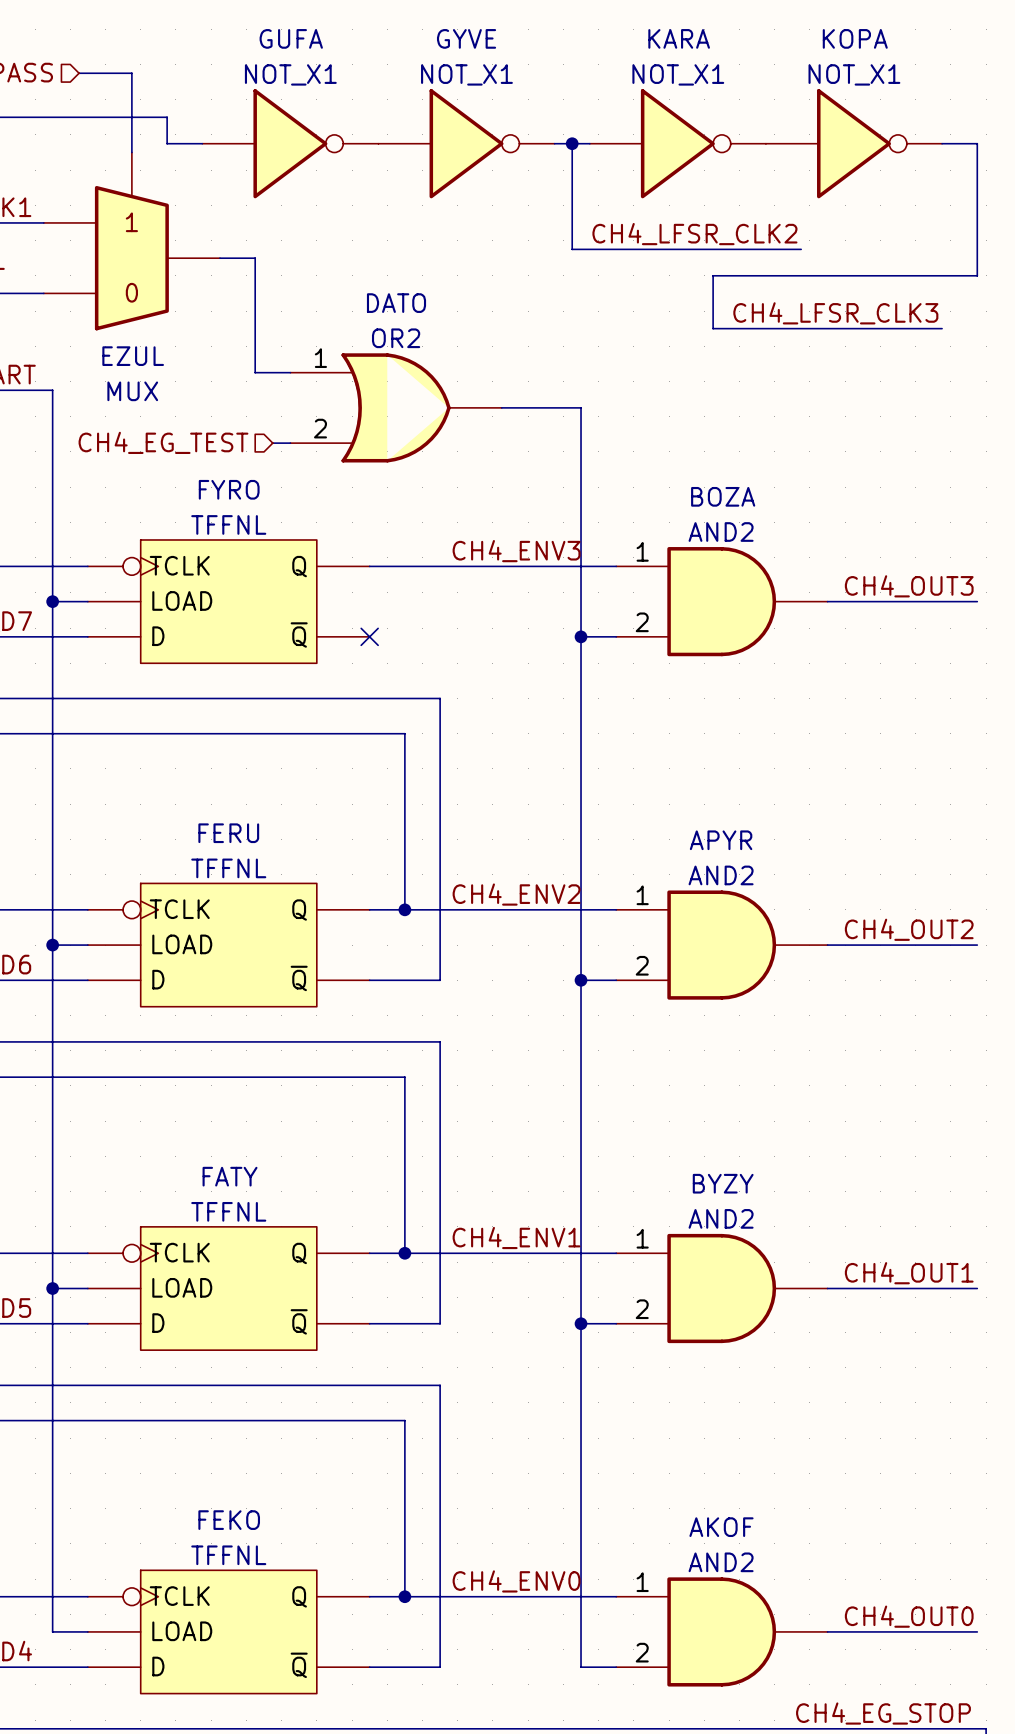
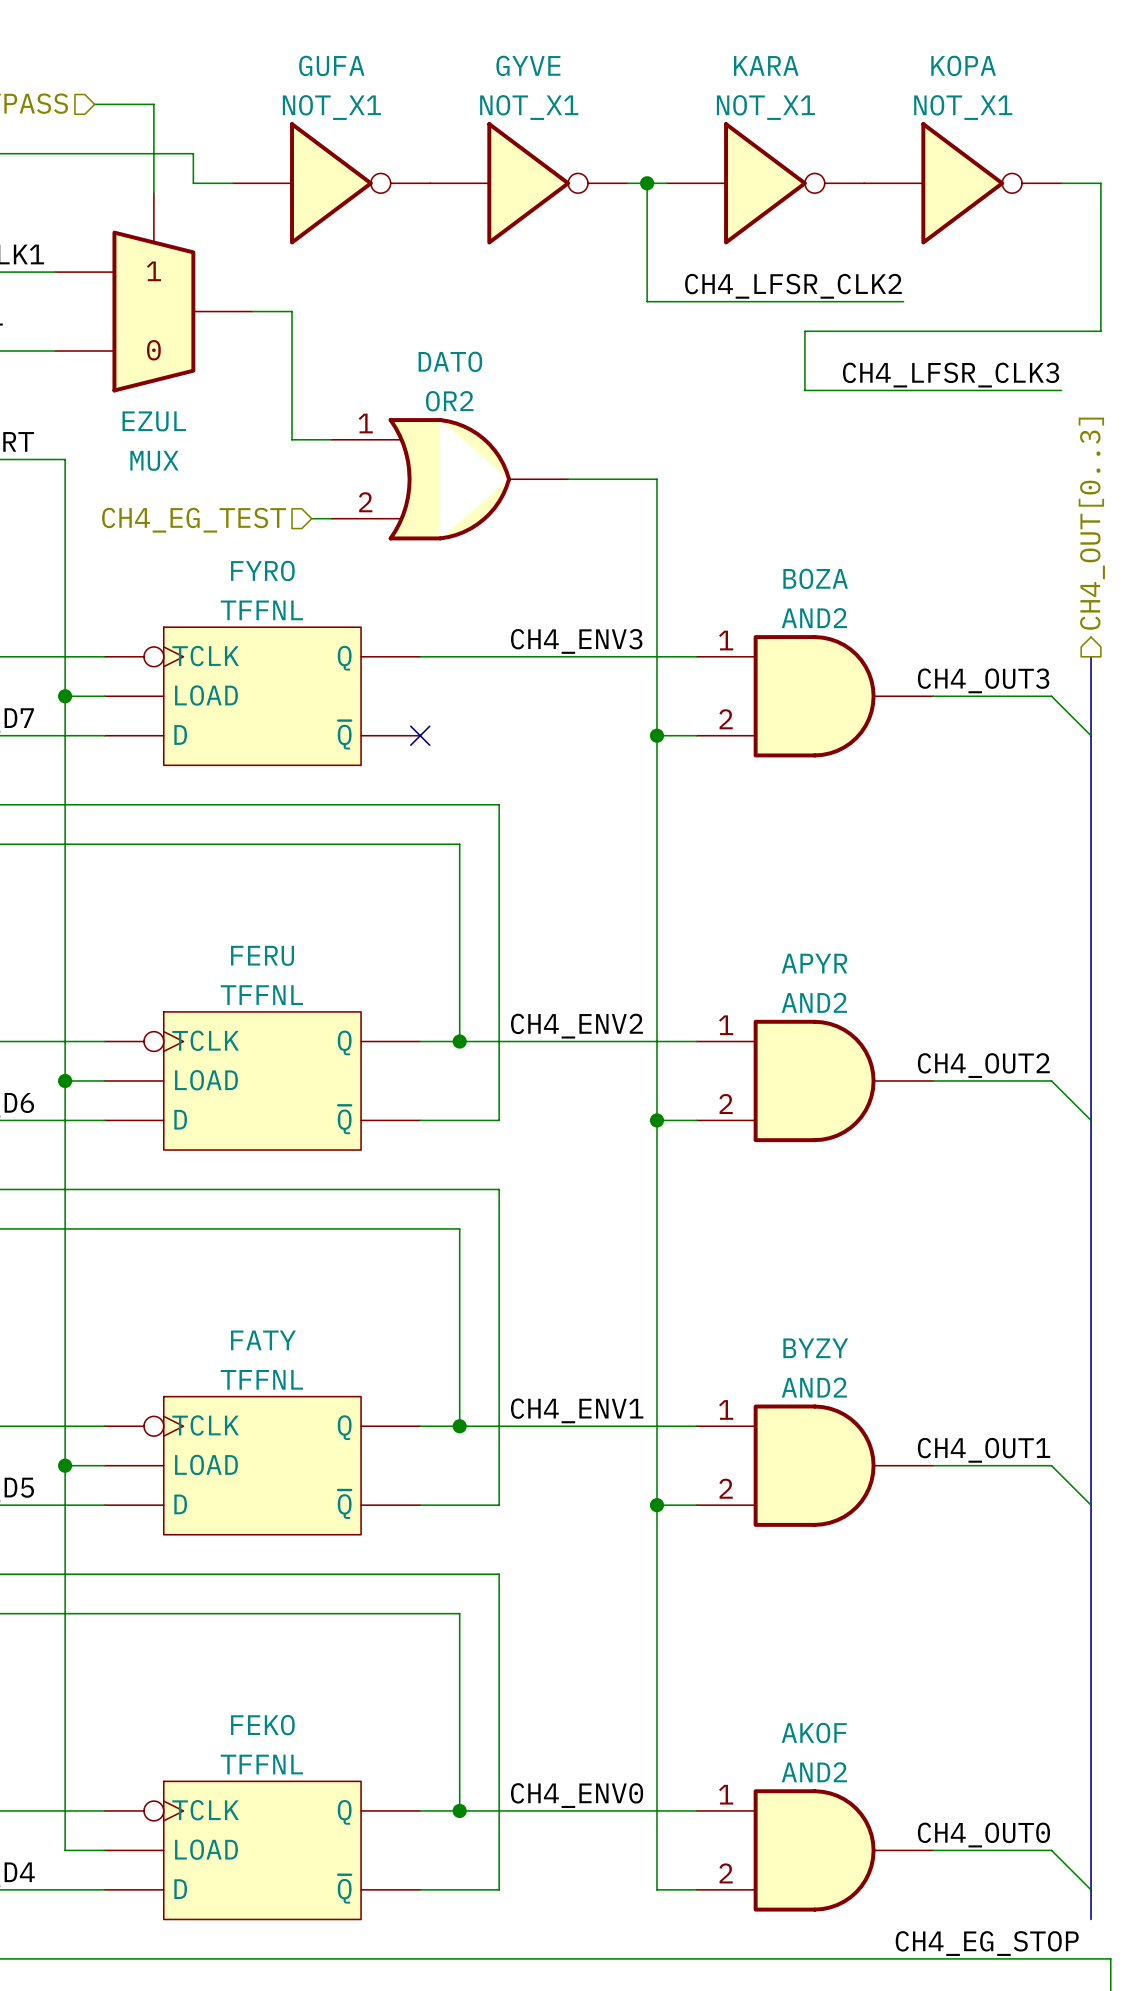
hierarchical label: none -> CH4_OUT[0..3] (1091, 523)
bus: none -> (1091, 656) (1091, 1919)
label position: CH4_OUT3 (909, 586) -> CH4_OUT3 (983, 680)
wire: (933, 601) (977, 601) -> (1051, 696) (1091, 735)
label position: CH4_OUT2 (909, 929) -> CH4_OUT2 (983, 1065)
wire: (933, 945) (977, 945) -> (1051, 1080) (1091, 1120)
label position: CH4_OUT1 (909, 1273) -> CH4_OUT1 (984, 1450)
wire: (933, 1288) (977, 1288) -> (1051, 1465) (1091, 1505)
label position: CH4_OUT0 (909, 1616) -> CH4_OUT0 (983, 1835)
wire: (933, 1631) (977, 1631) -> (1051, 1850) (1091, 1889)

